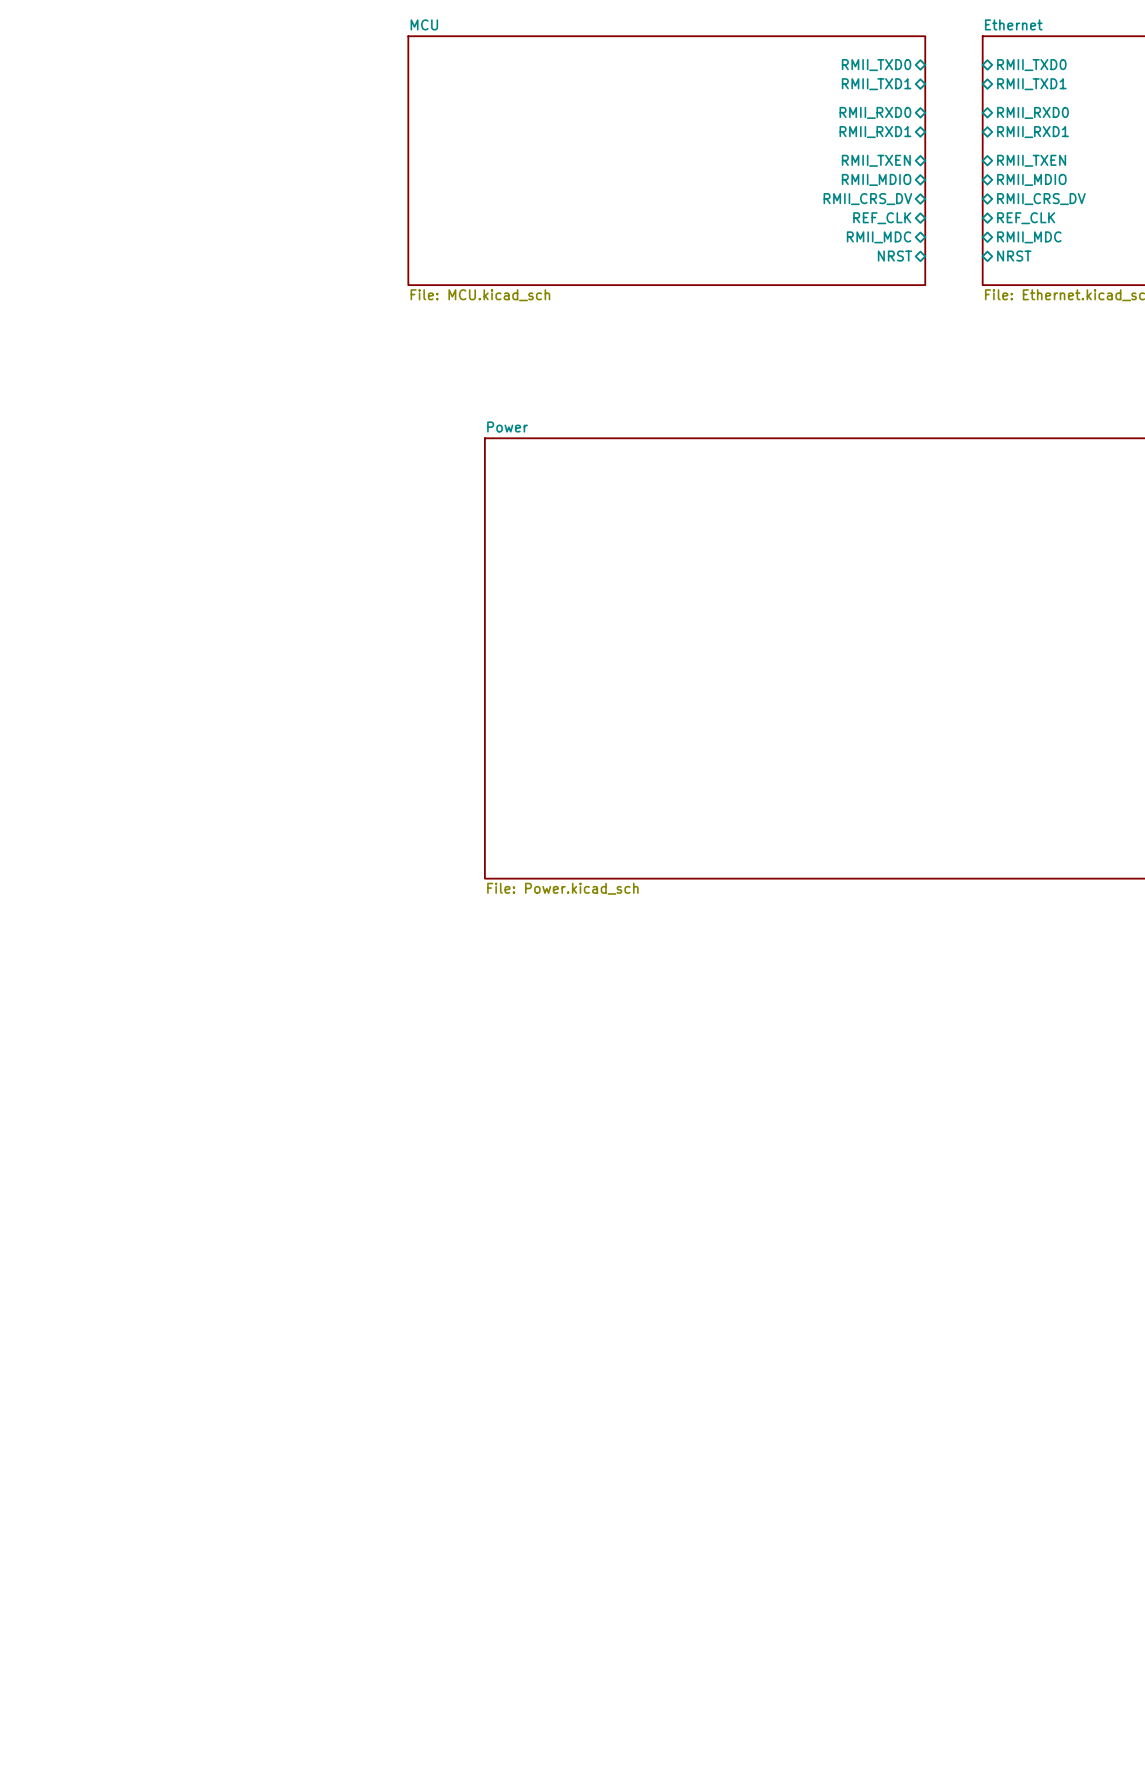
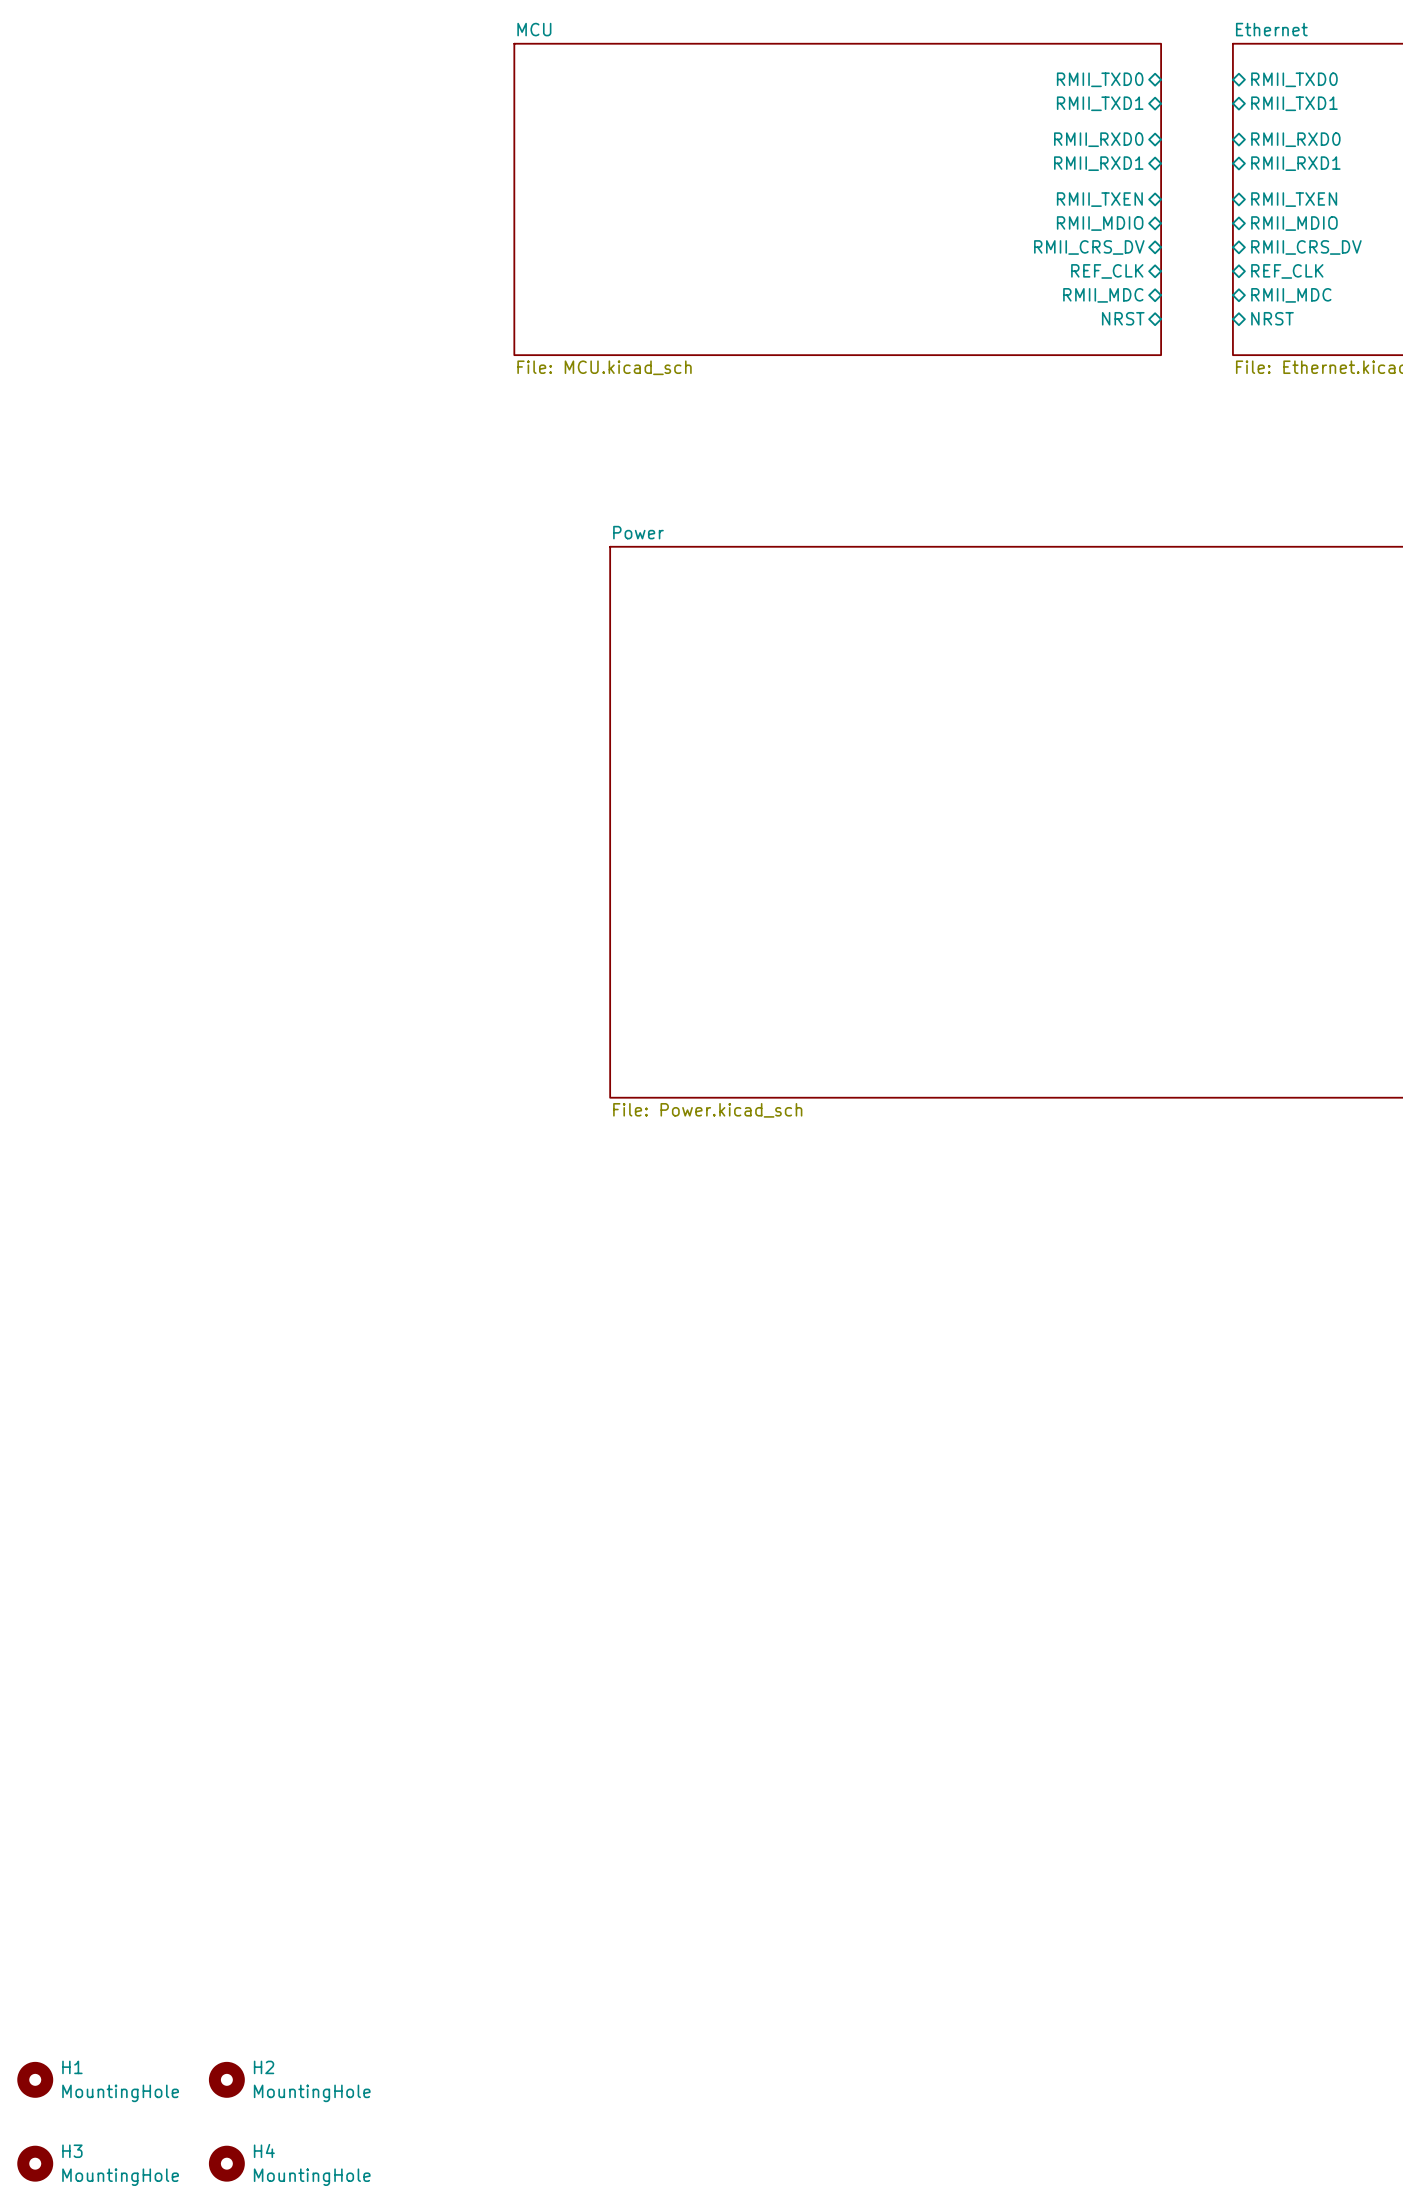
H1: none -> MountingHole (35, 2079)
H2: none -> MountingHole (226, 2079)
H3: none -> MountingHole (35, 2163)
H4: none -> MountingHole (226, 2163)

